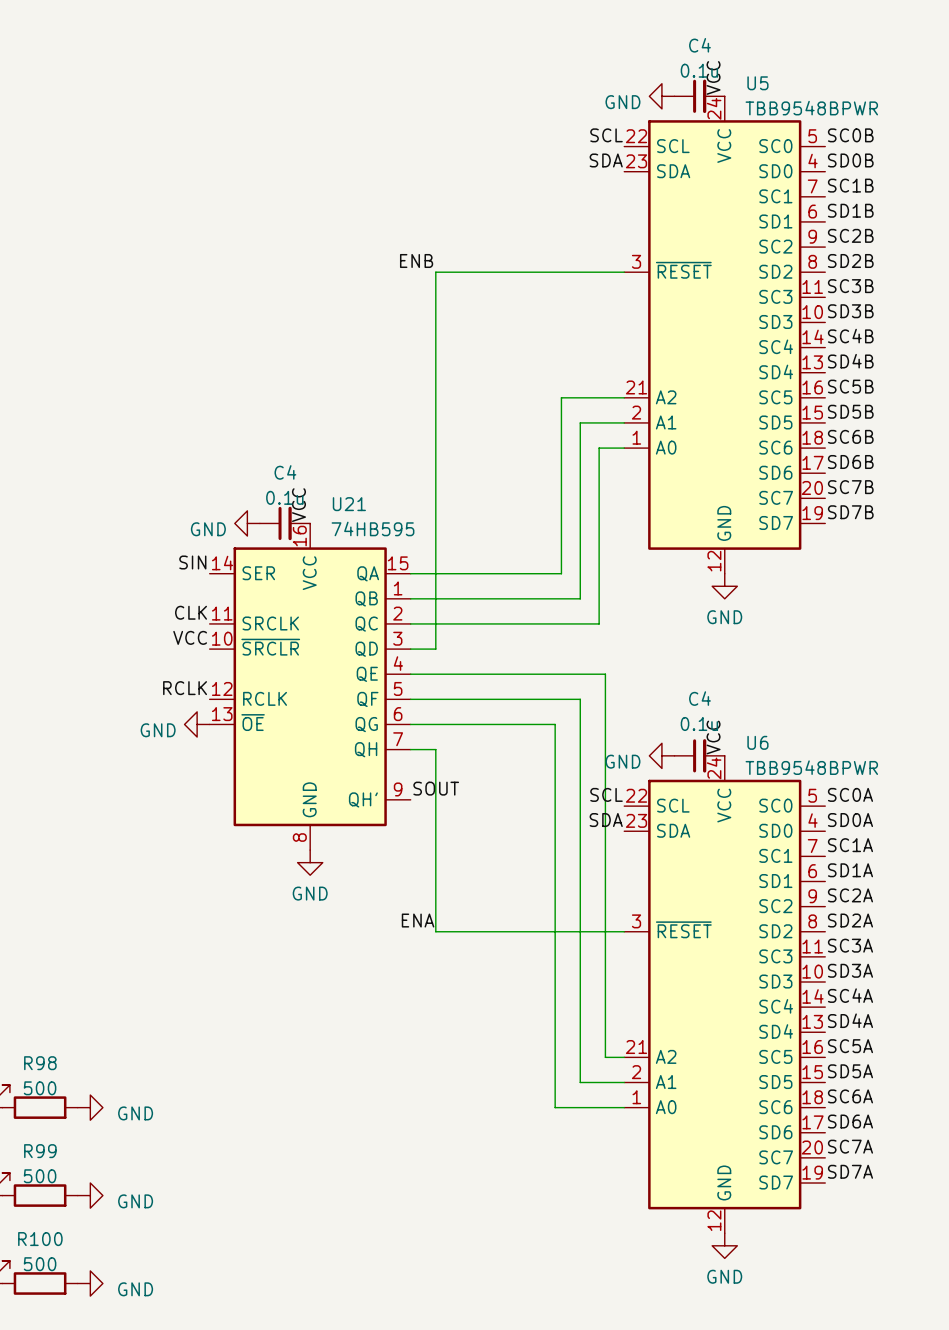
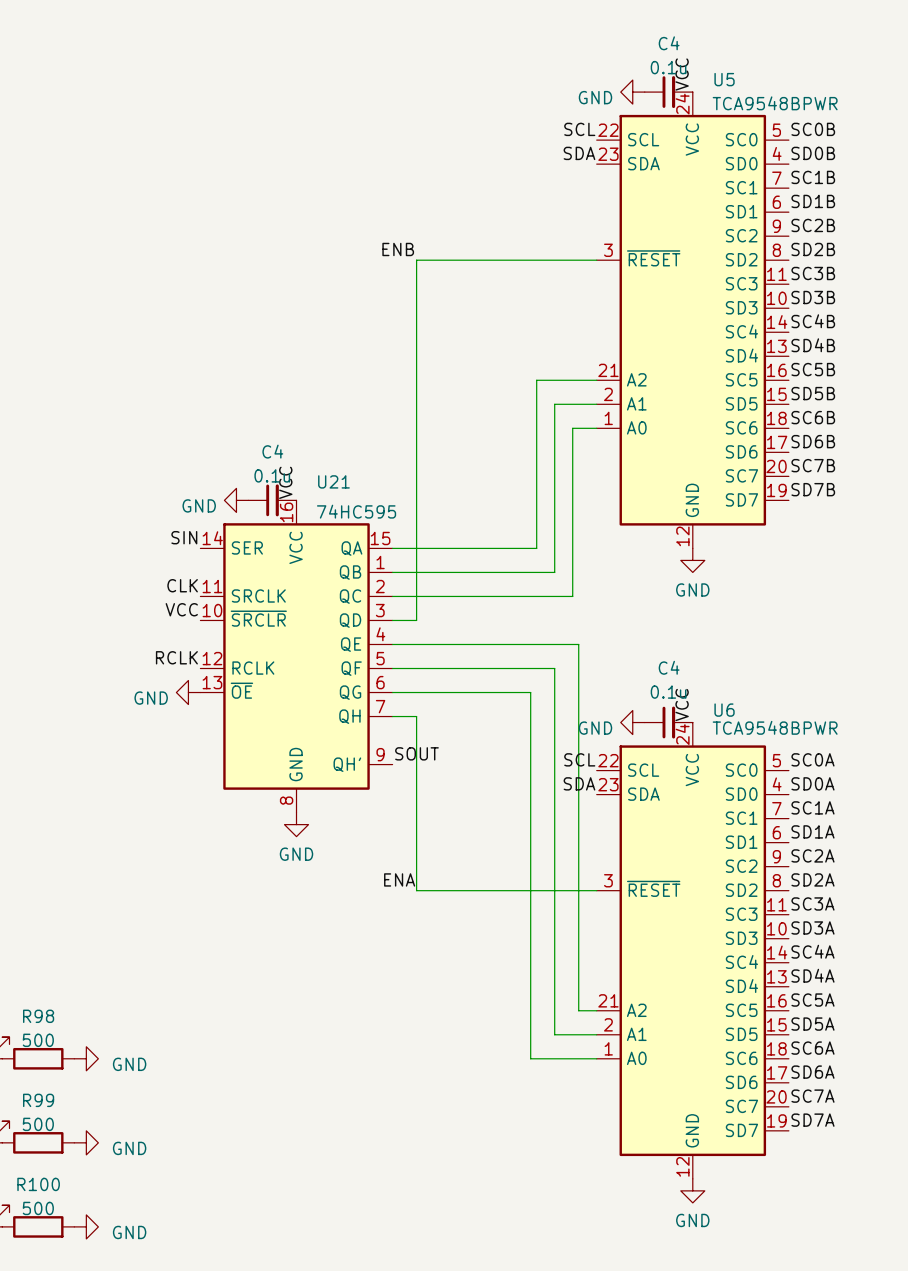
U5 value: TBB9548BPWR (811, 108) -> TCA9548BPWR (775, 103)
U21 value: 74HB595 (372, 528) -> 74HC595 (356, 511)
U6 value: TBB9548BPWR (811, 767) -> TCA9548BPWR (775, 727)

